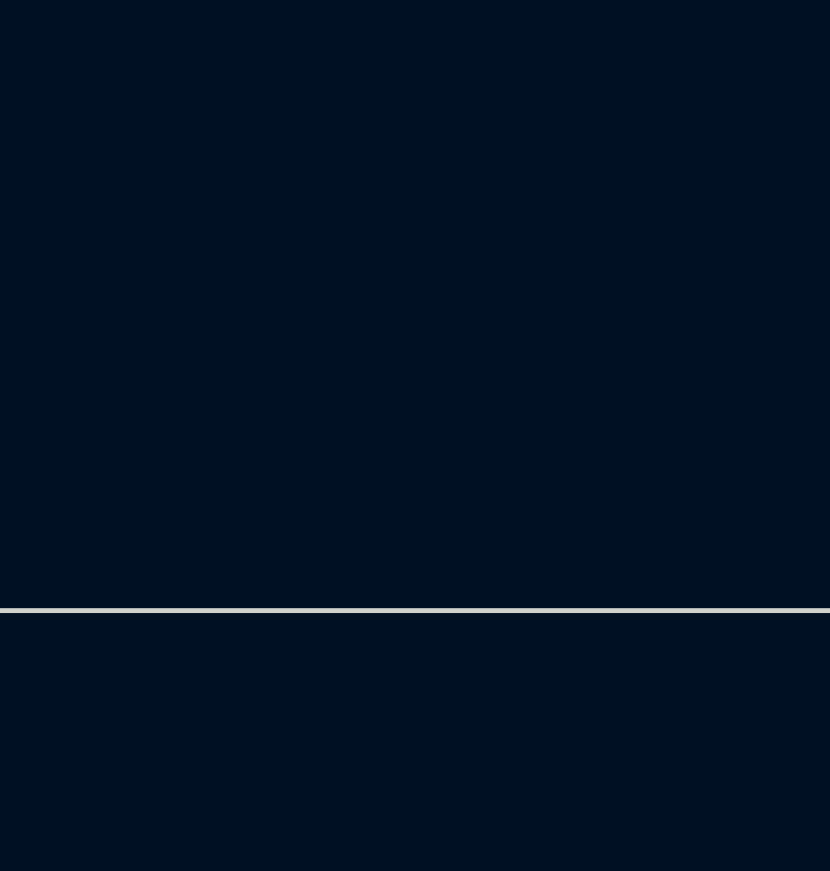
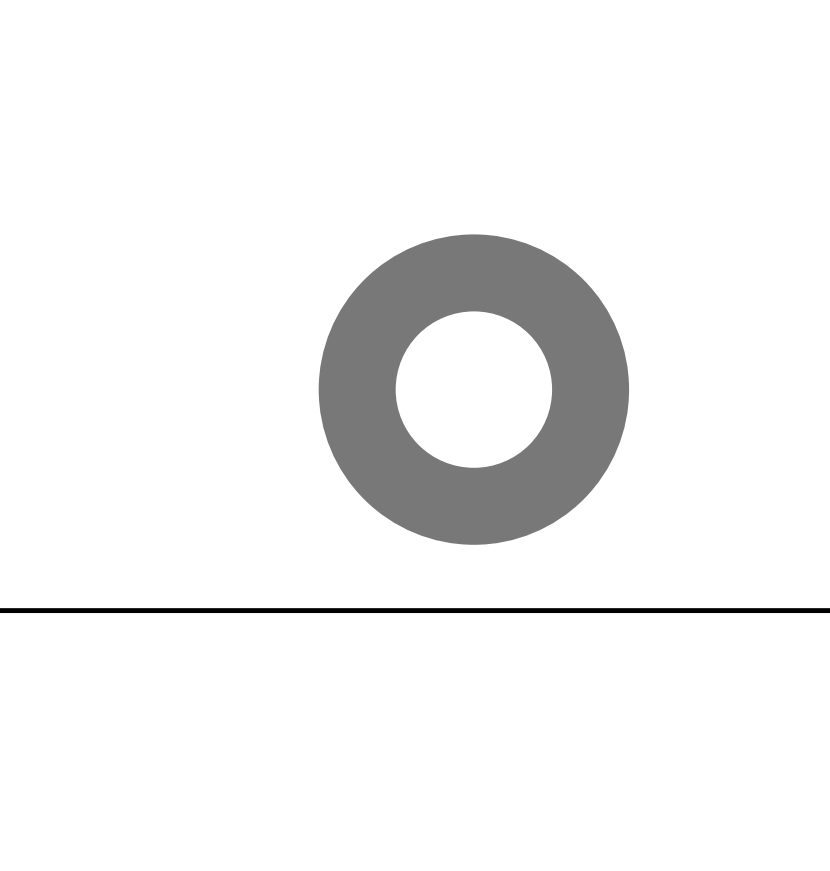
via: none -> (473, 389)

